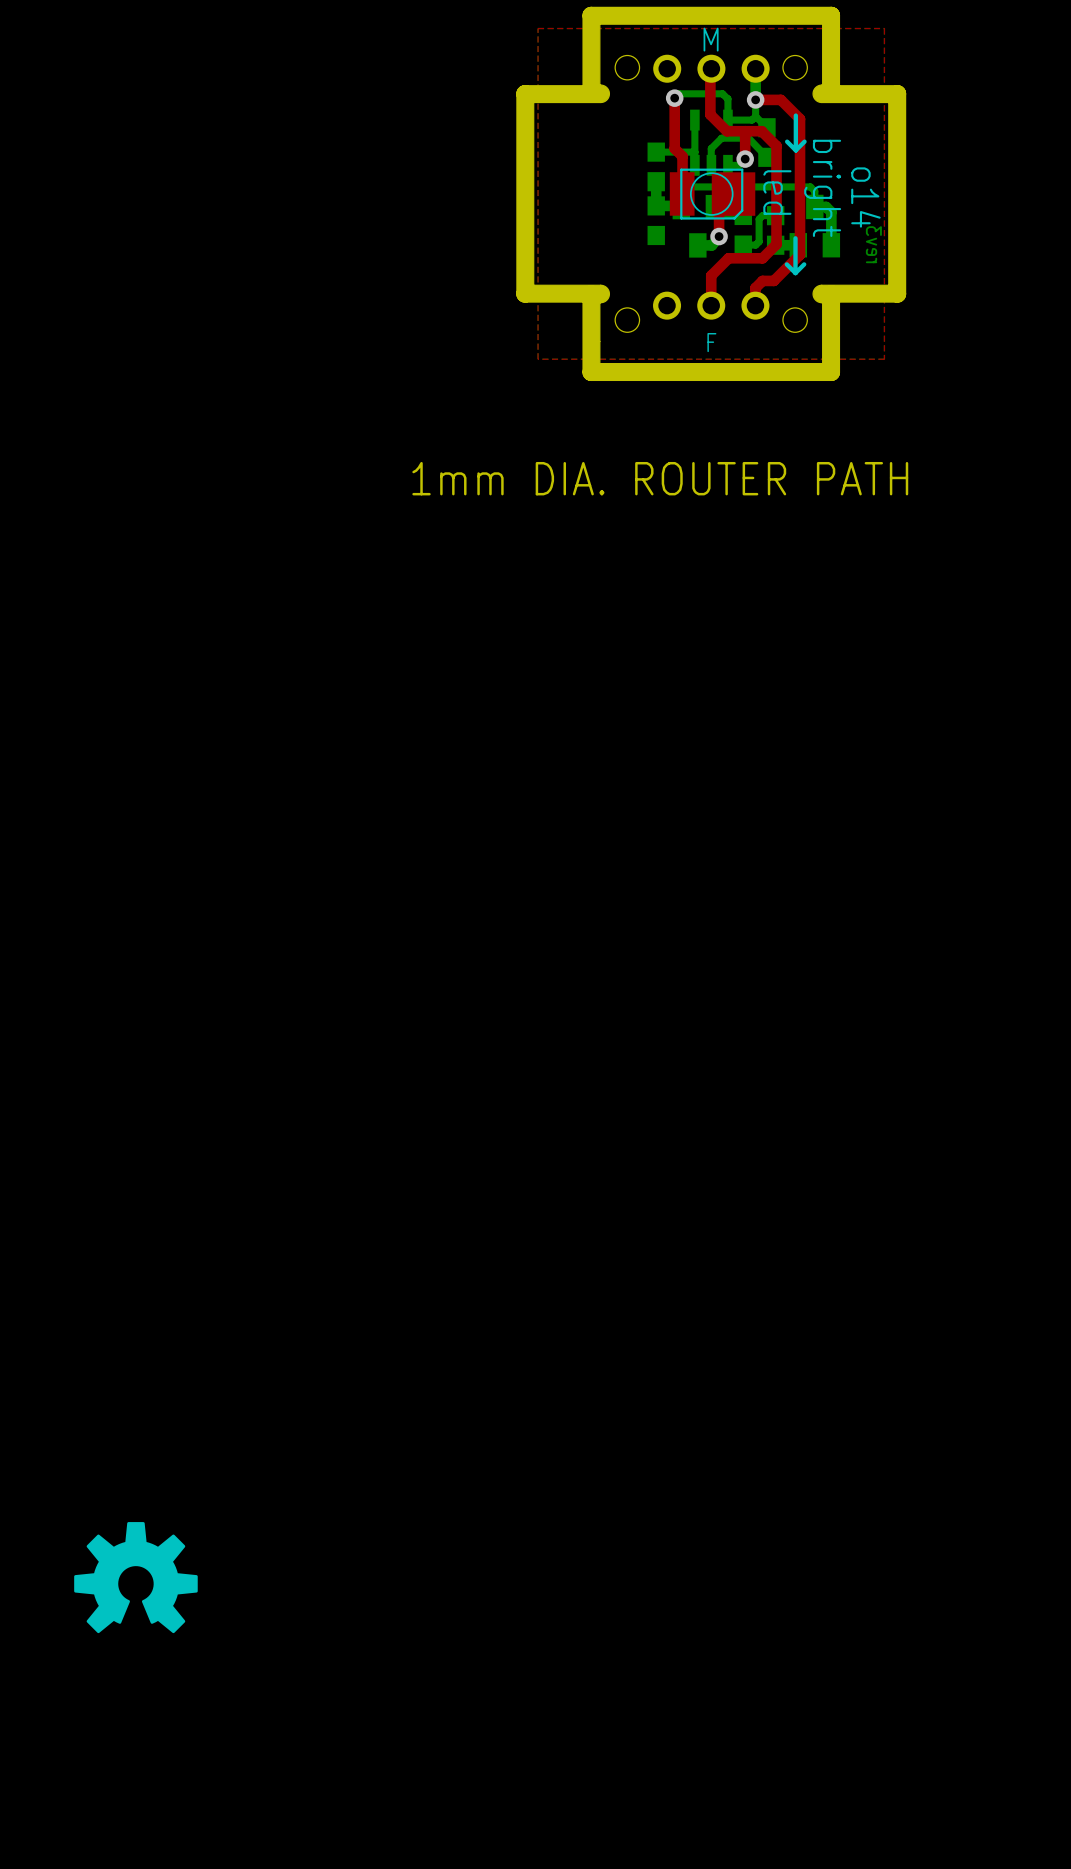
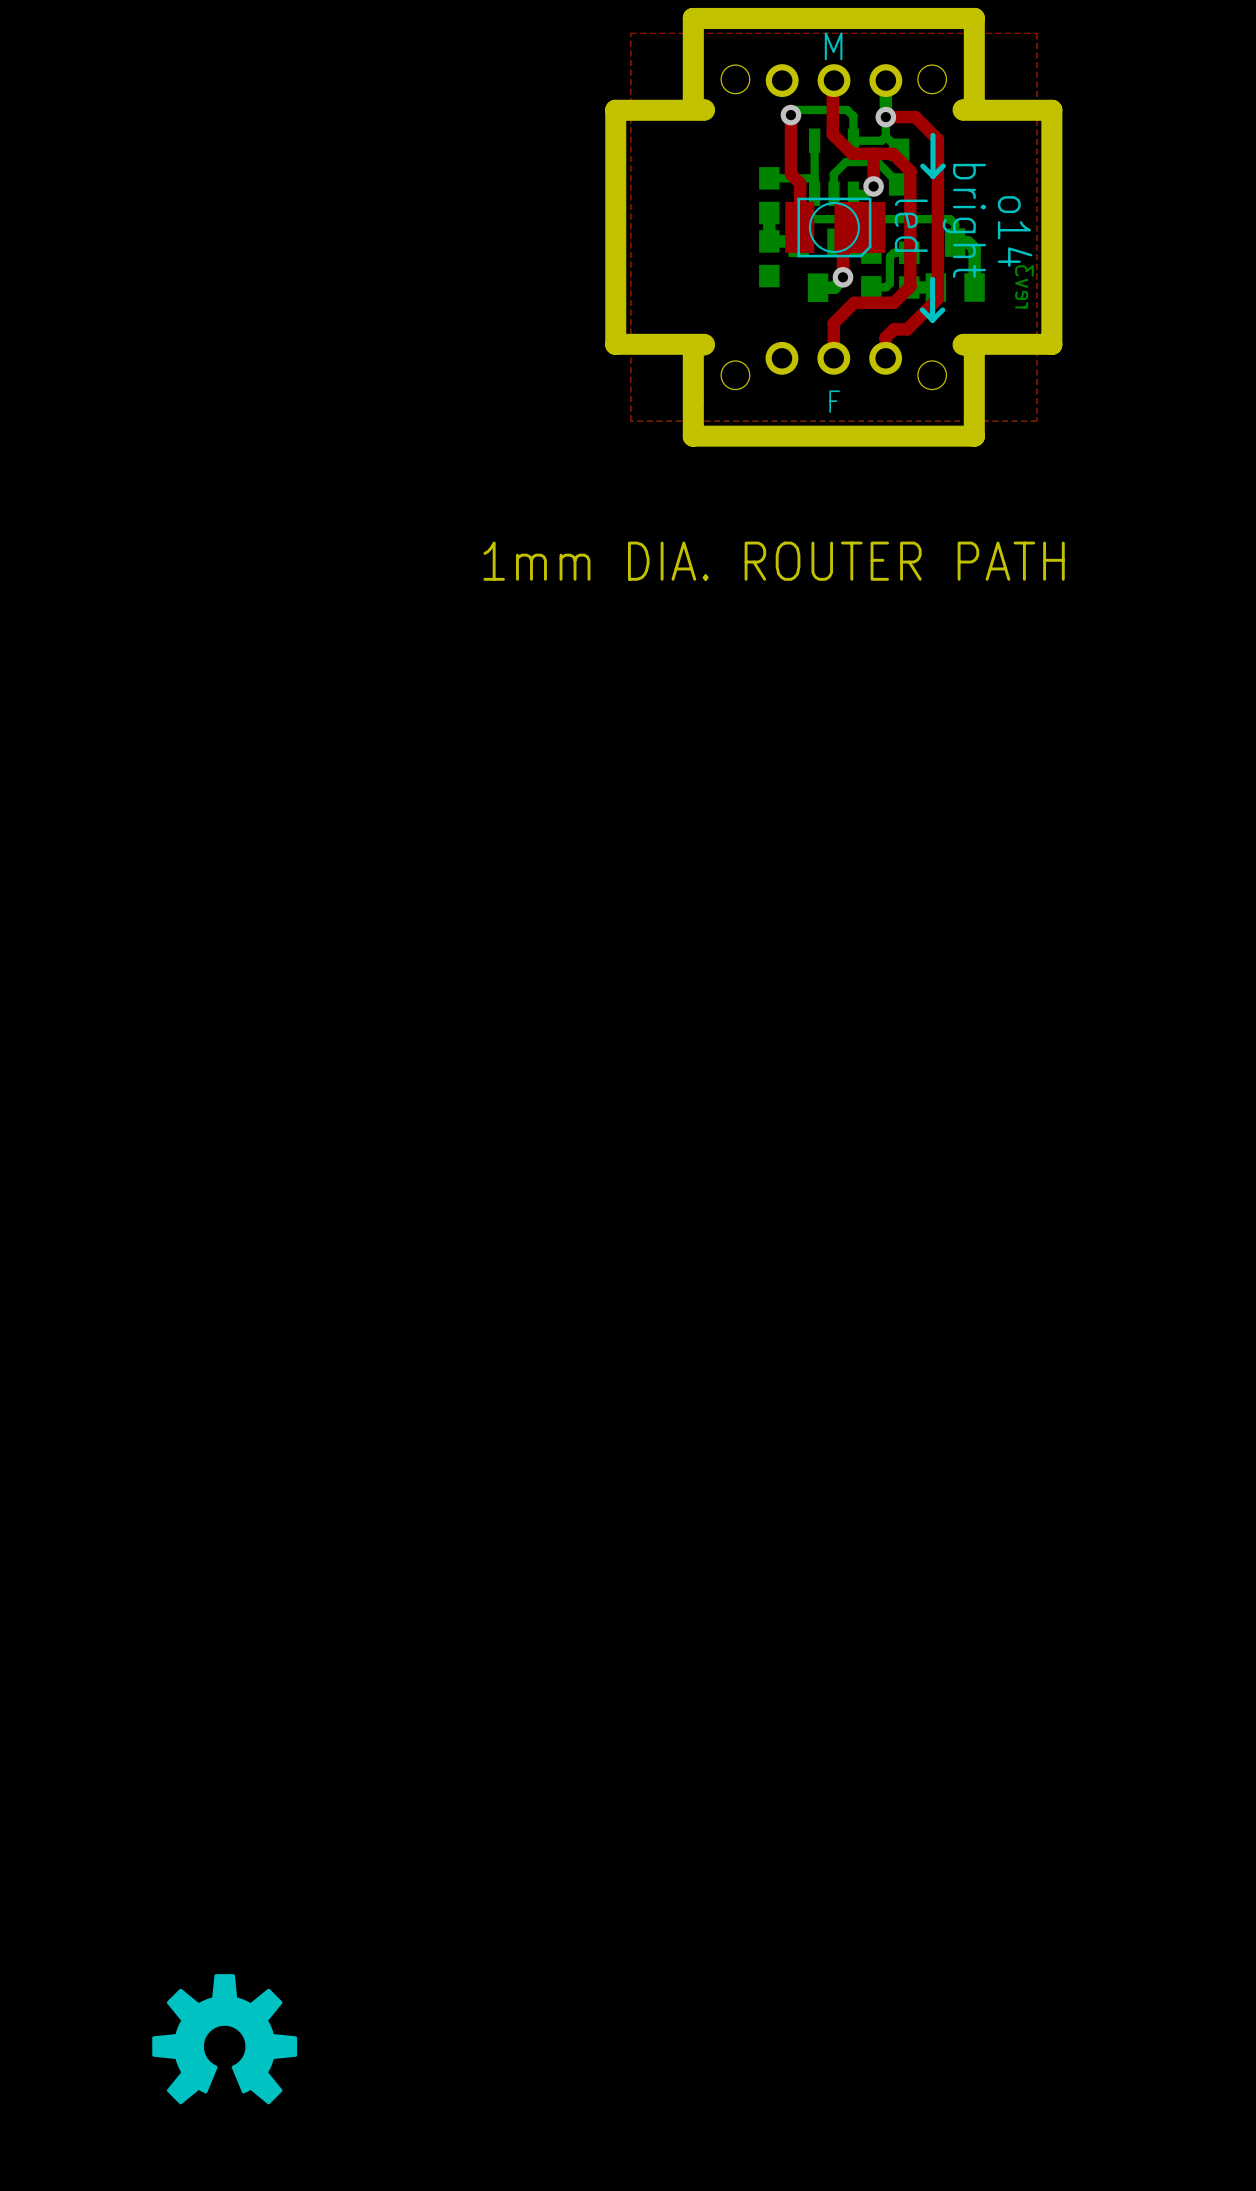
drawing position: (135, 1577) -> (224, 2039)

